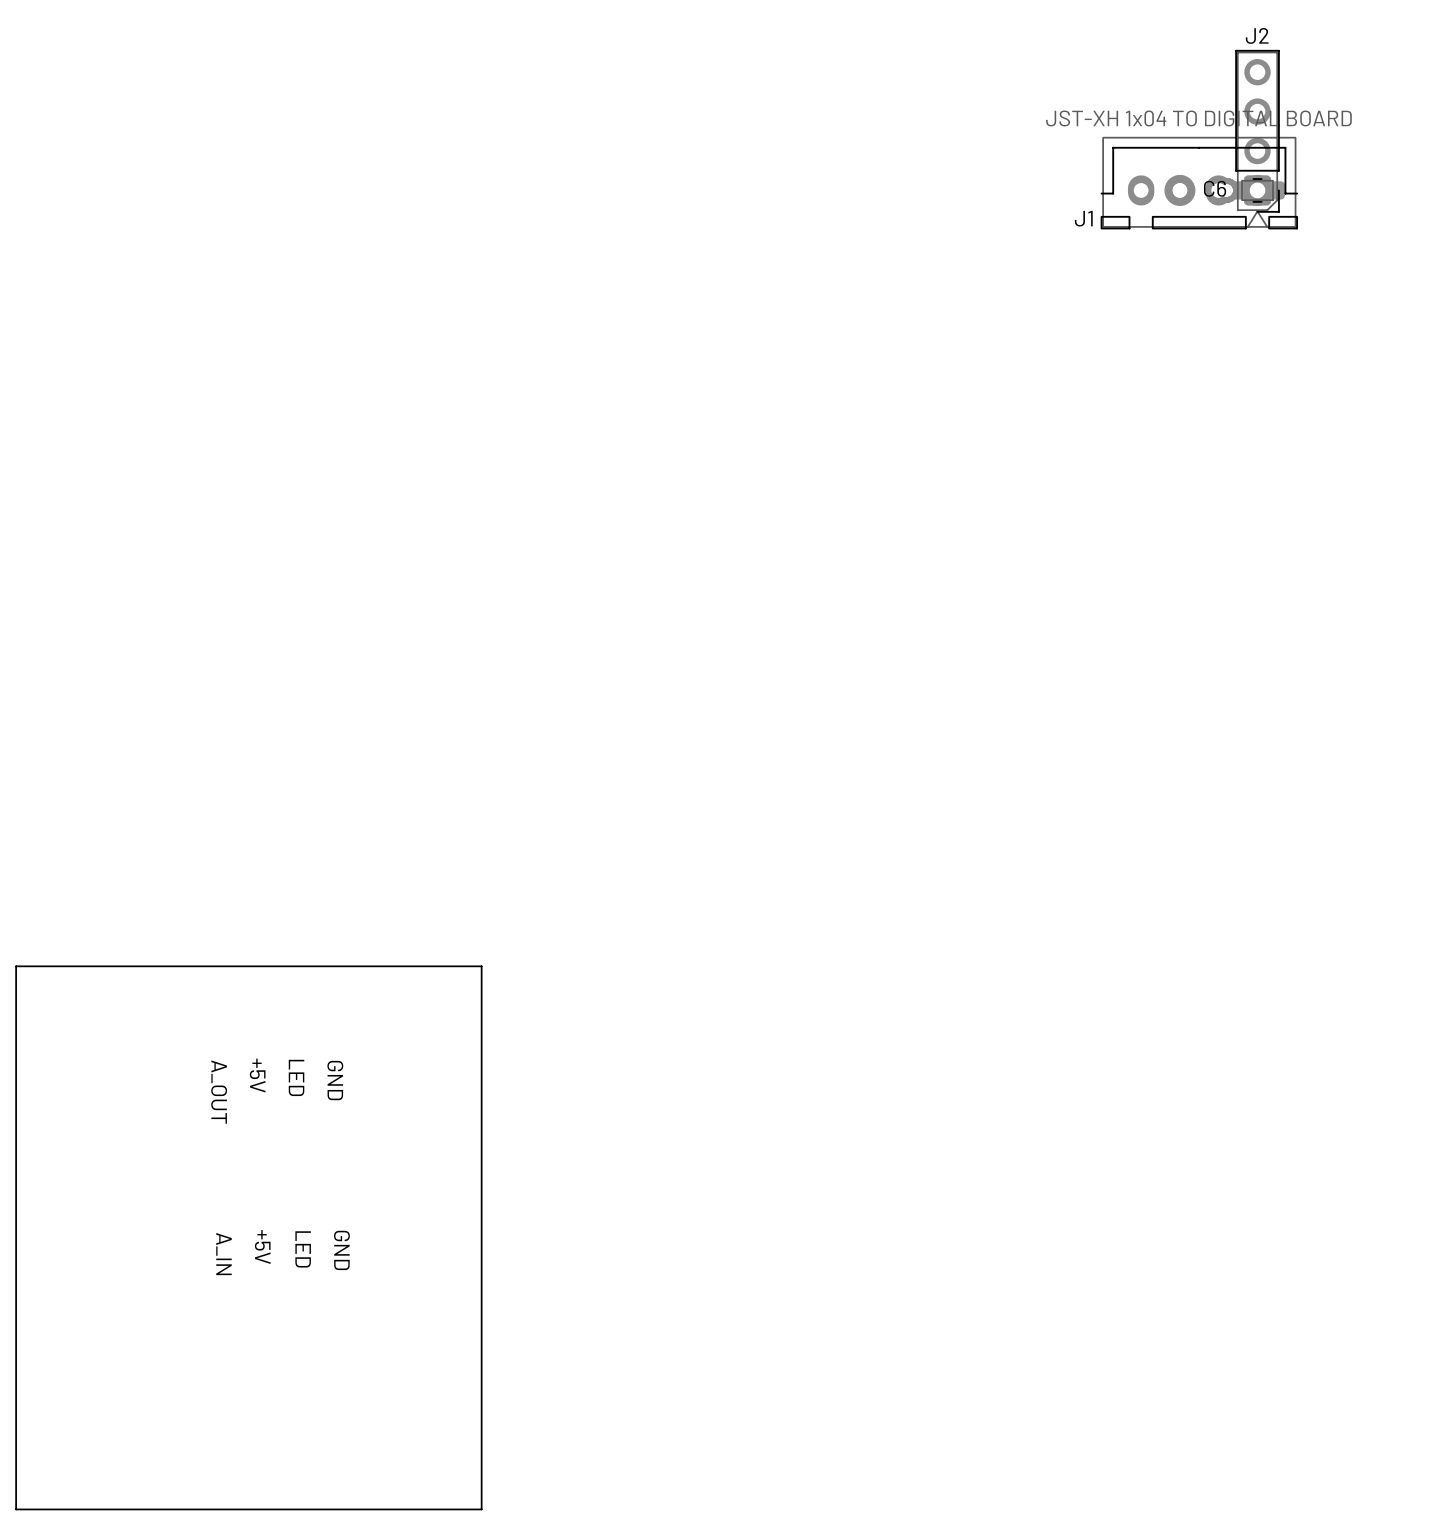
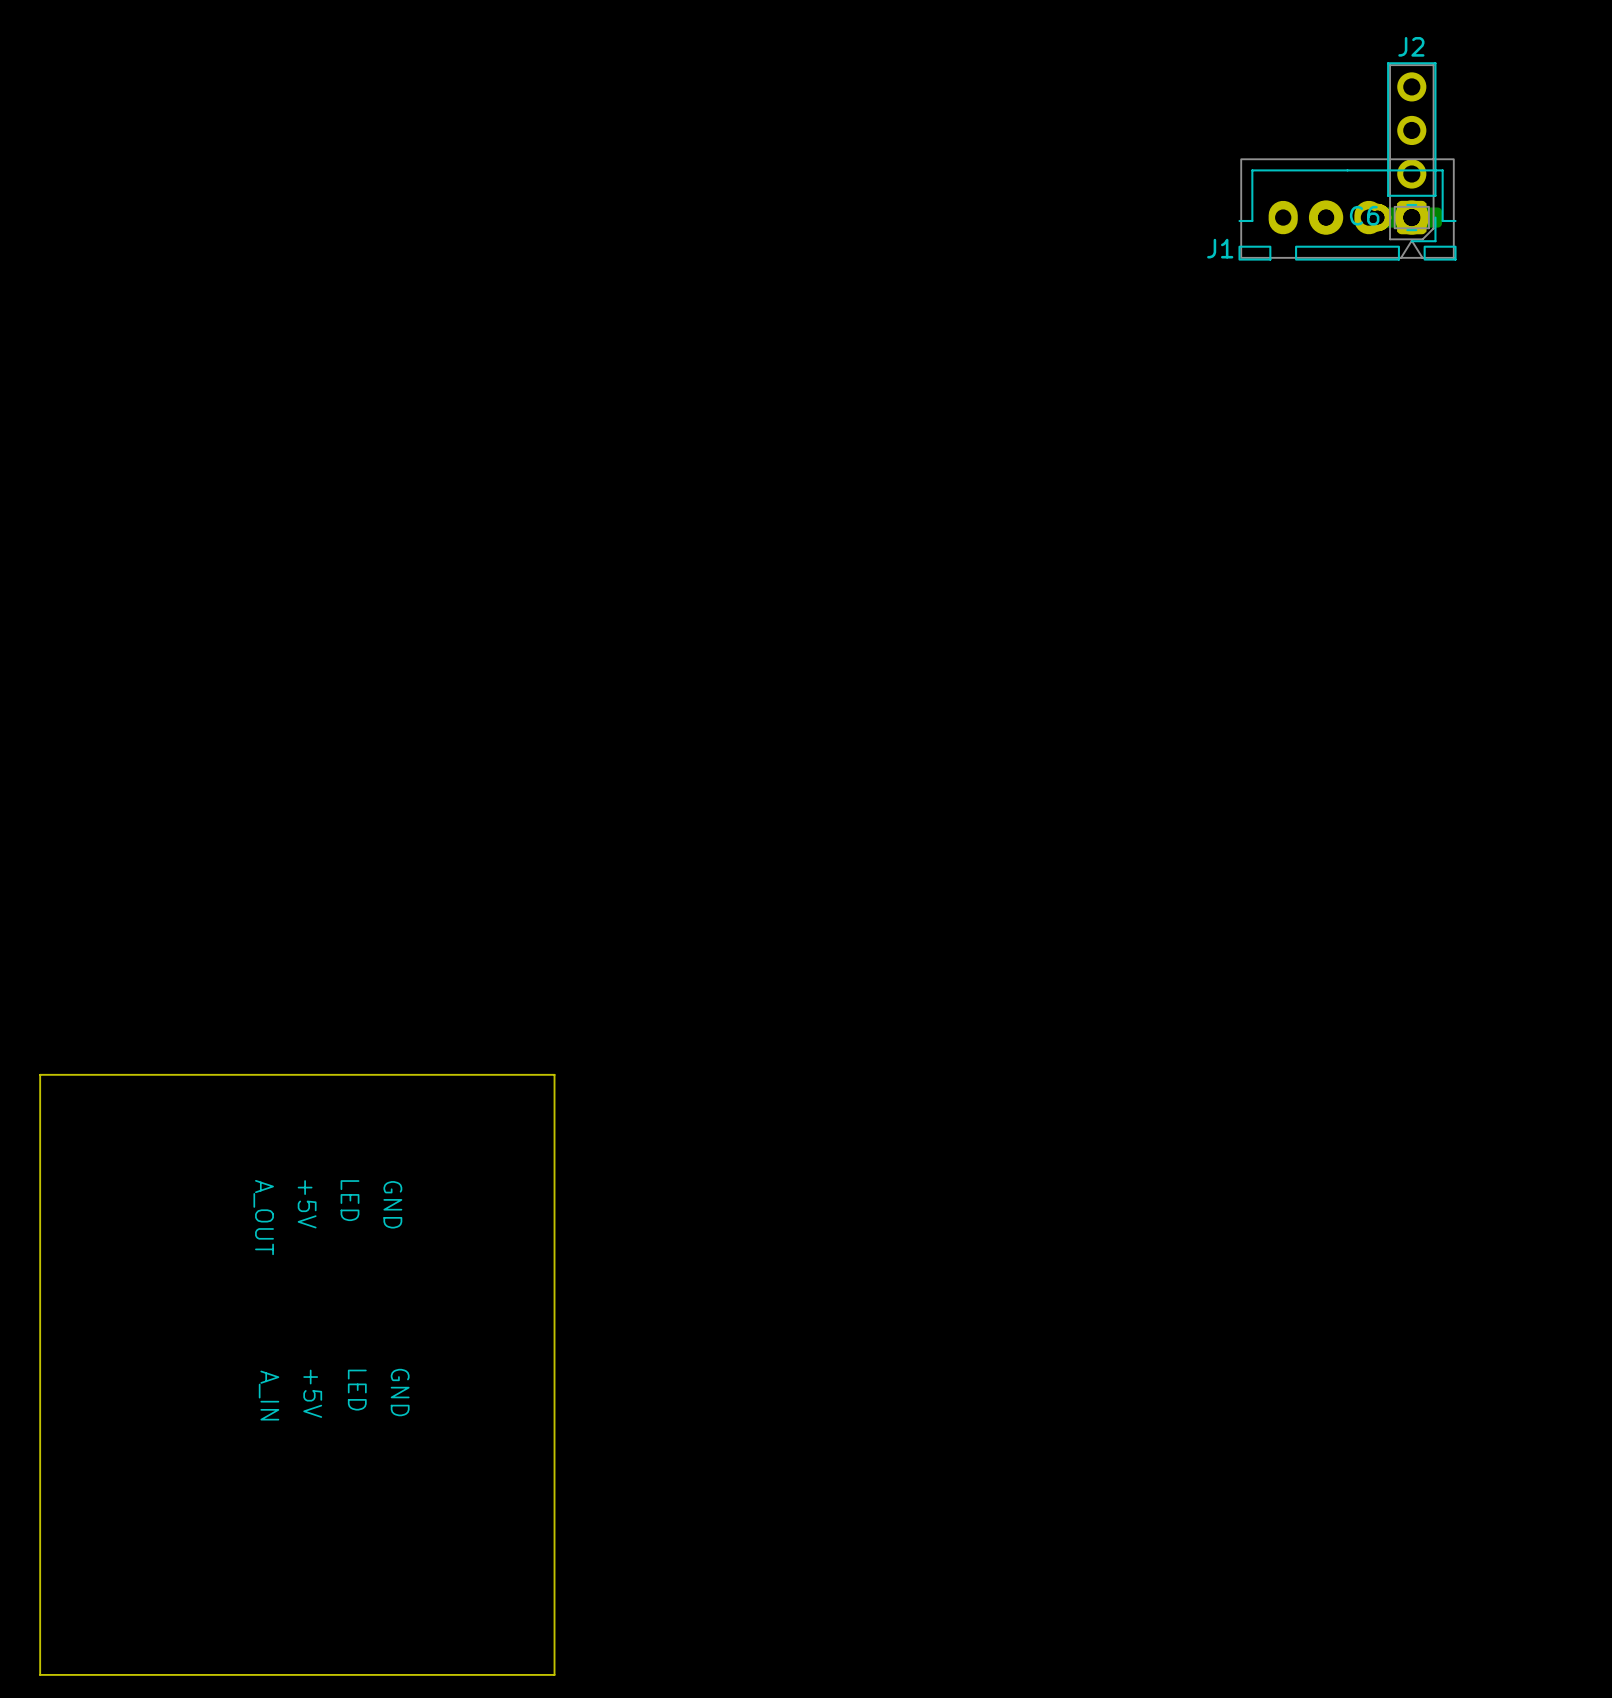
J1 value: JST-XH 1x04 TO DIGITAL BOARD (1198, 118) -> none

